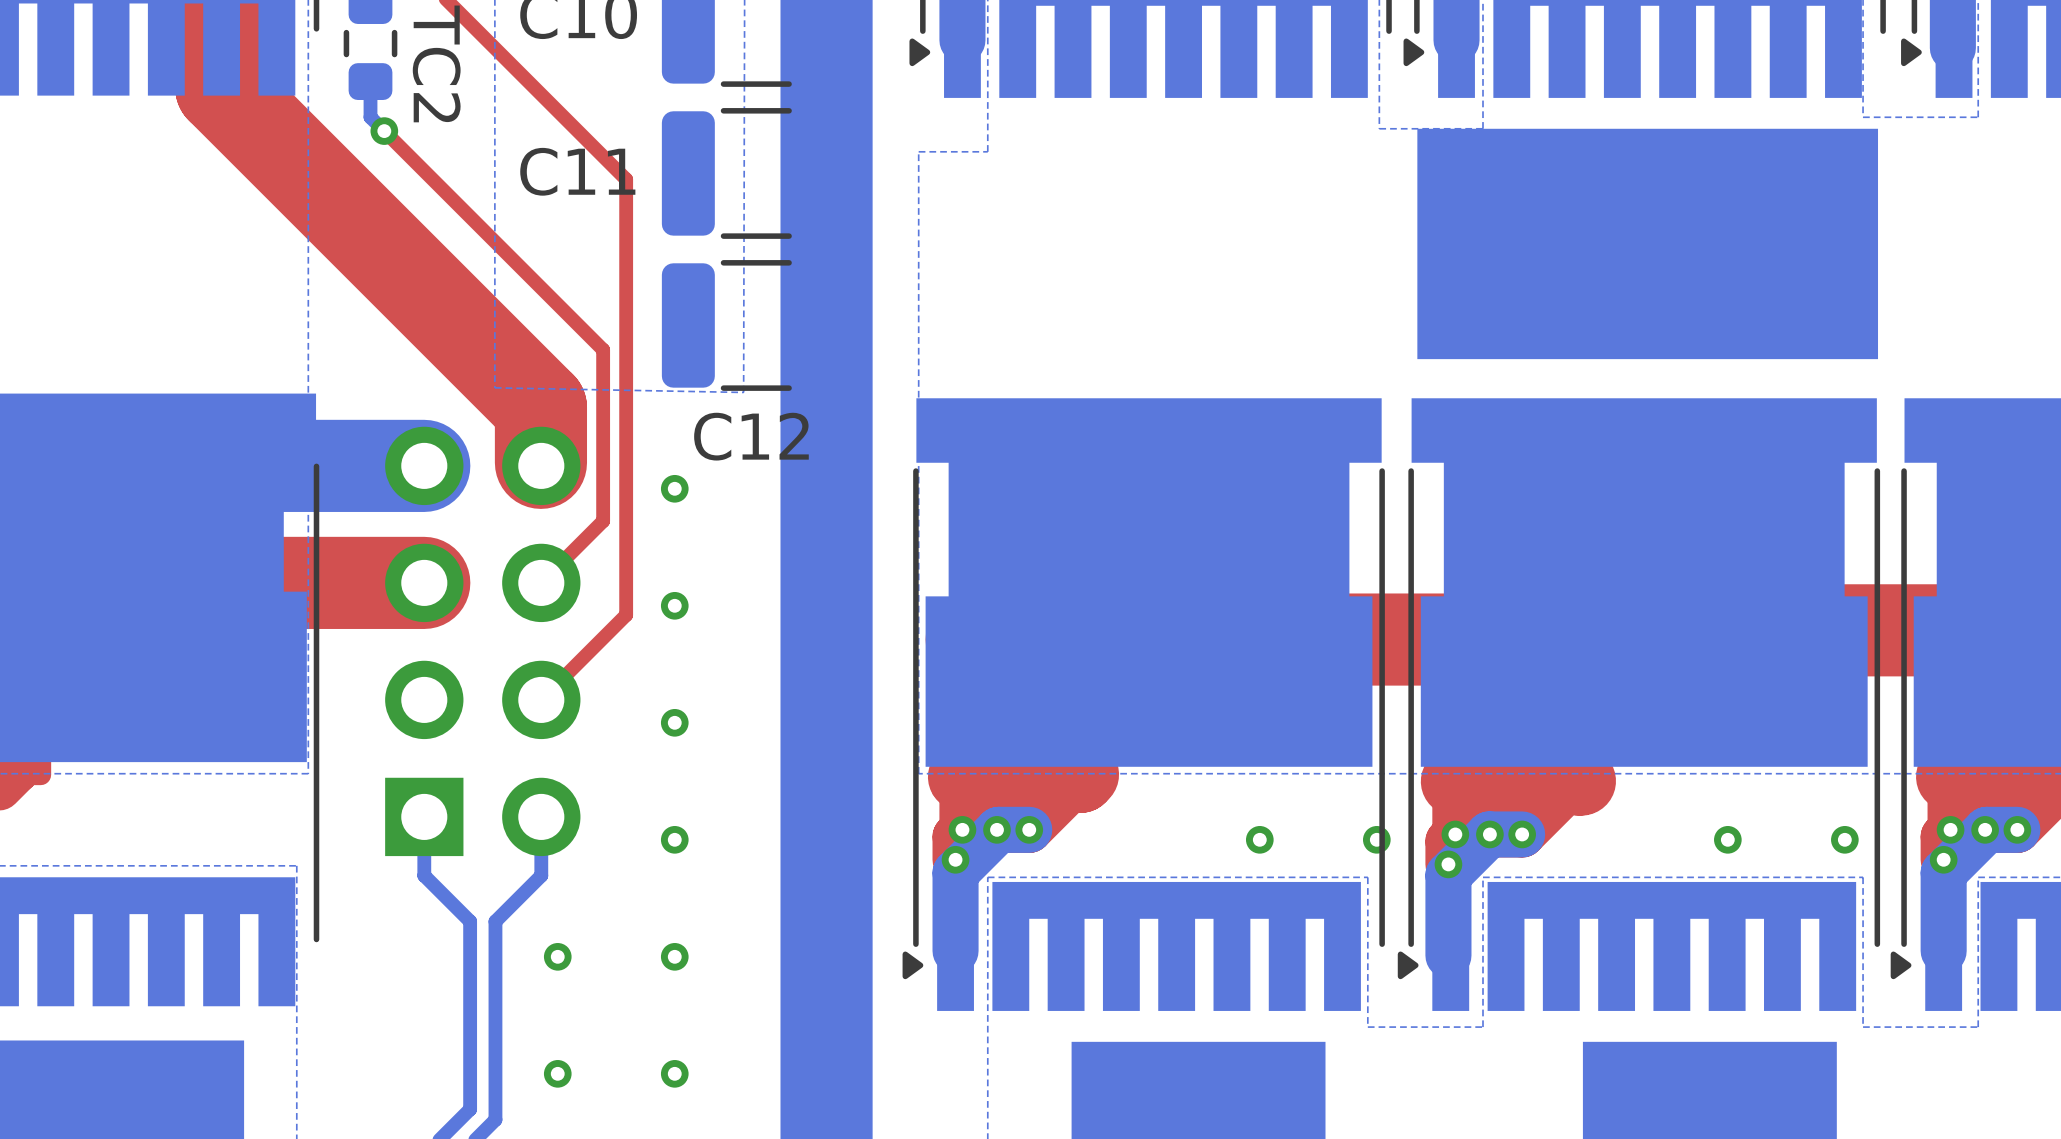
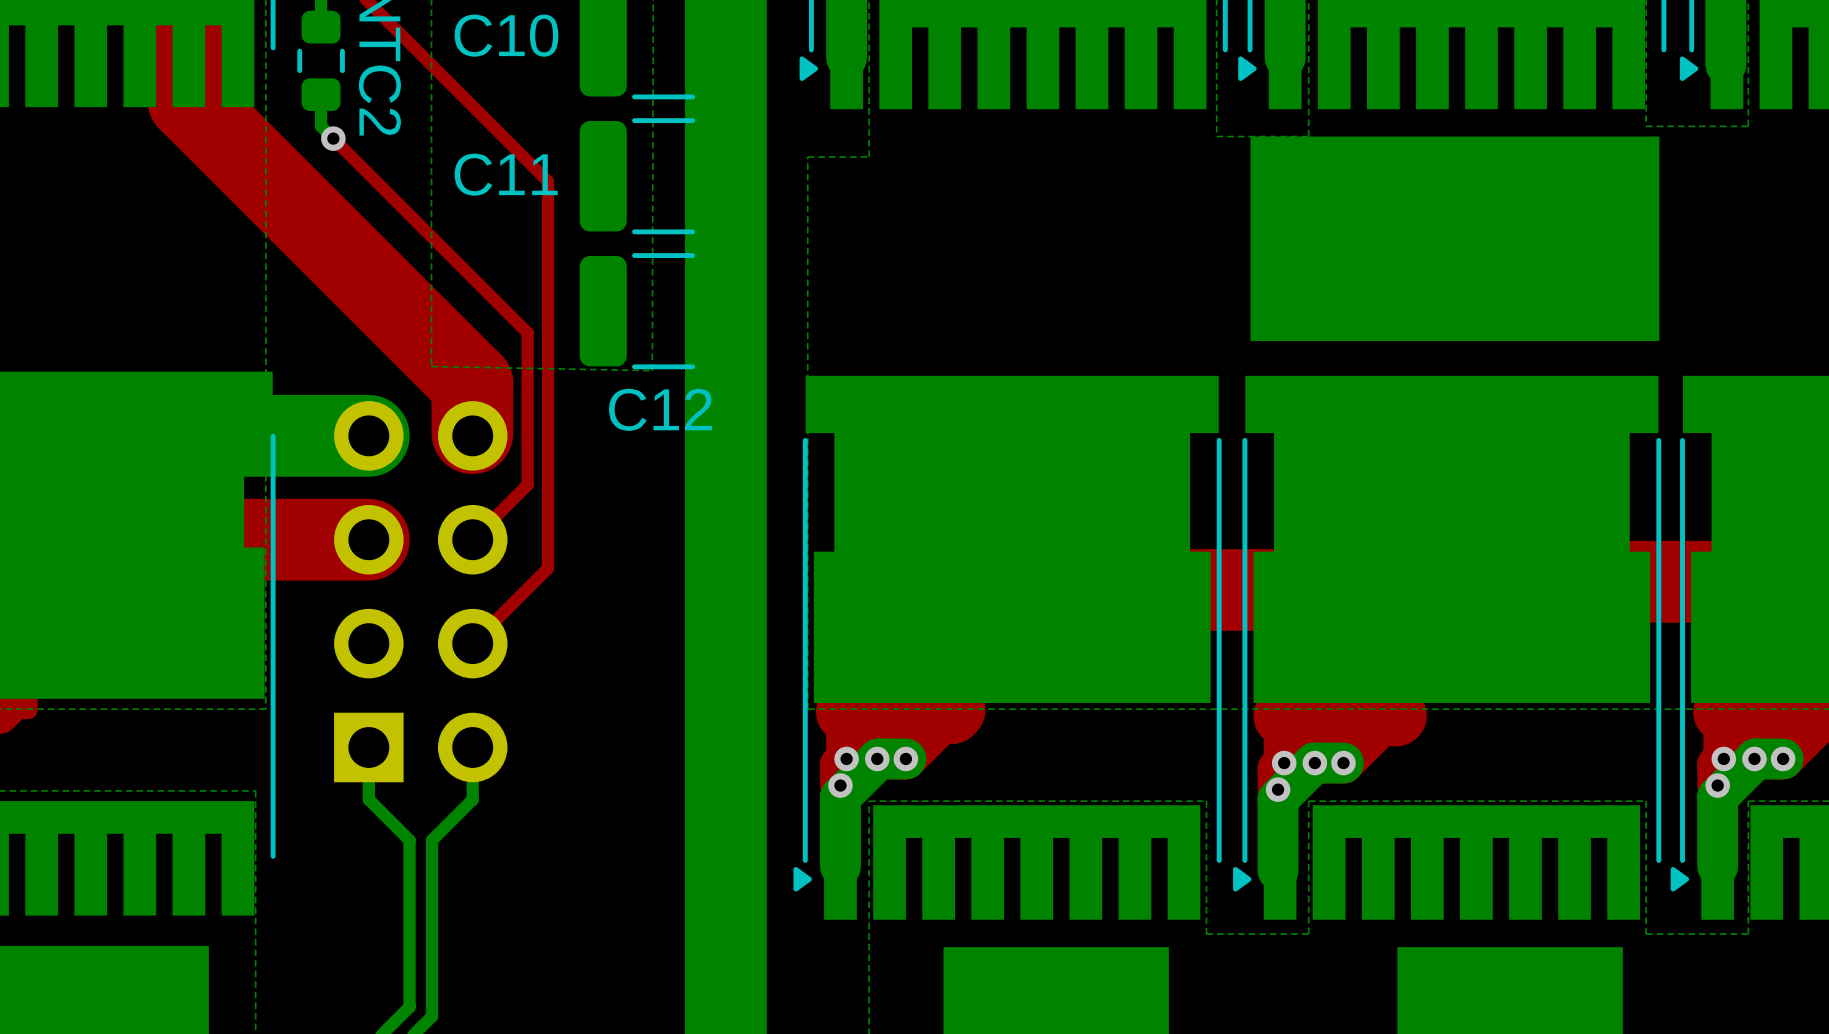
via: (674, 488) -> none
via: (674, 605) -> none
via: (674, 722) -> none
via: (674, 839) -> none
via: (1259, 839) -> none
via: (1376, 839) -> none
via: (1727, 839) -> none
via: (1844, 839) -> none
via: (557, 956) -> none
via: (674, 956) -> none
via: (557, 1073) -> none
via: (674, 1073) -> none

